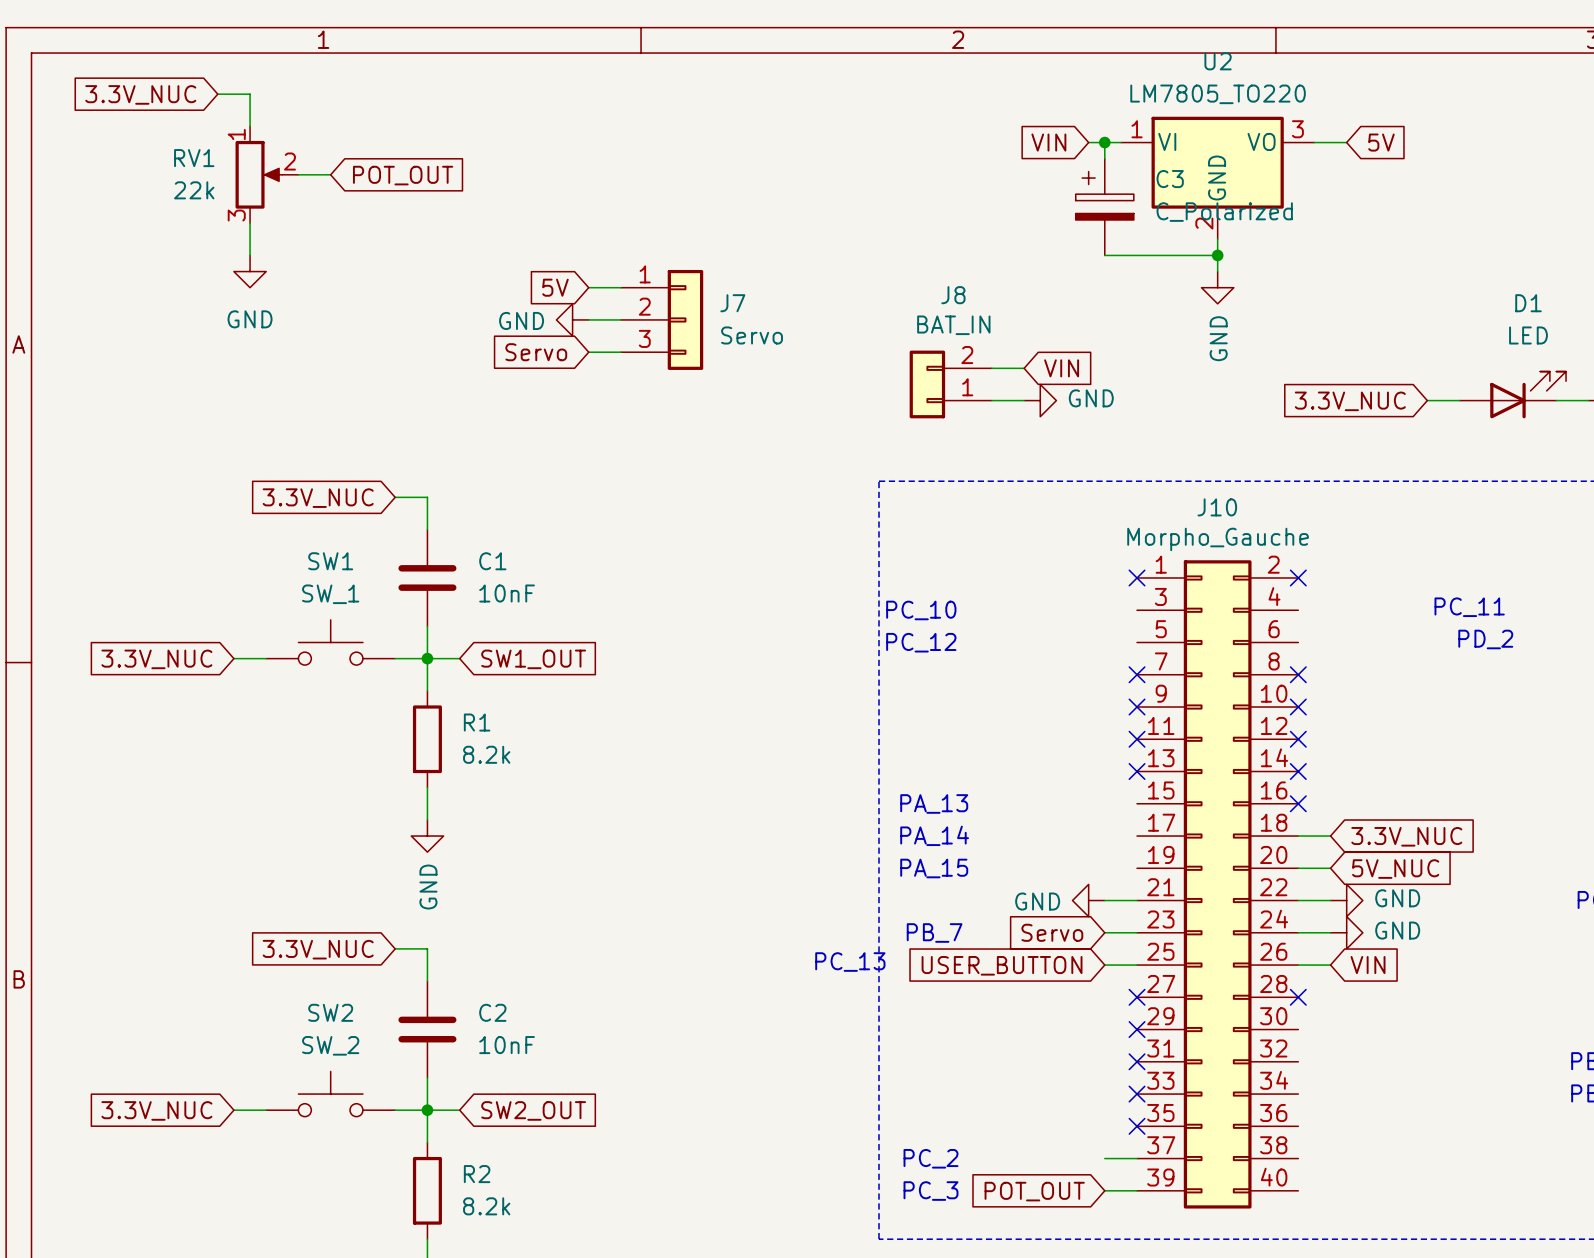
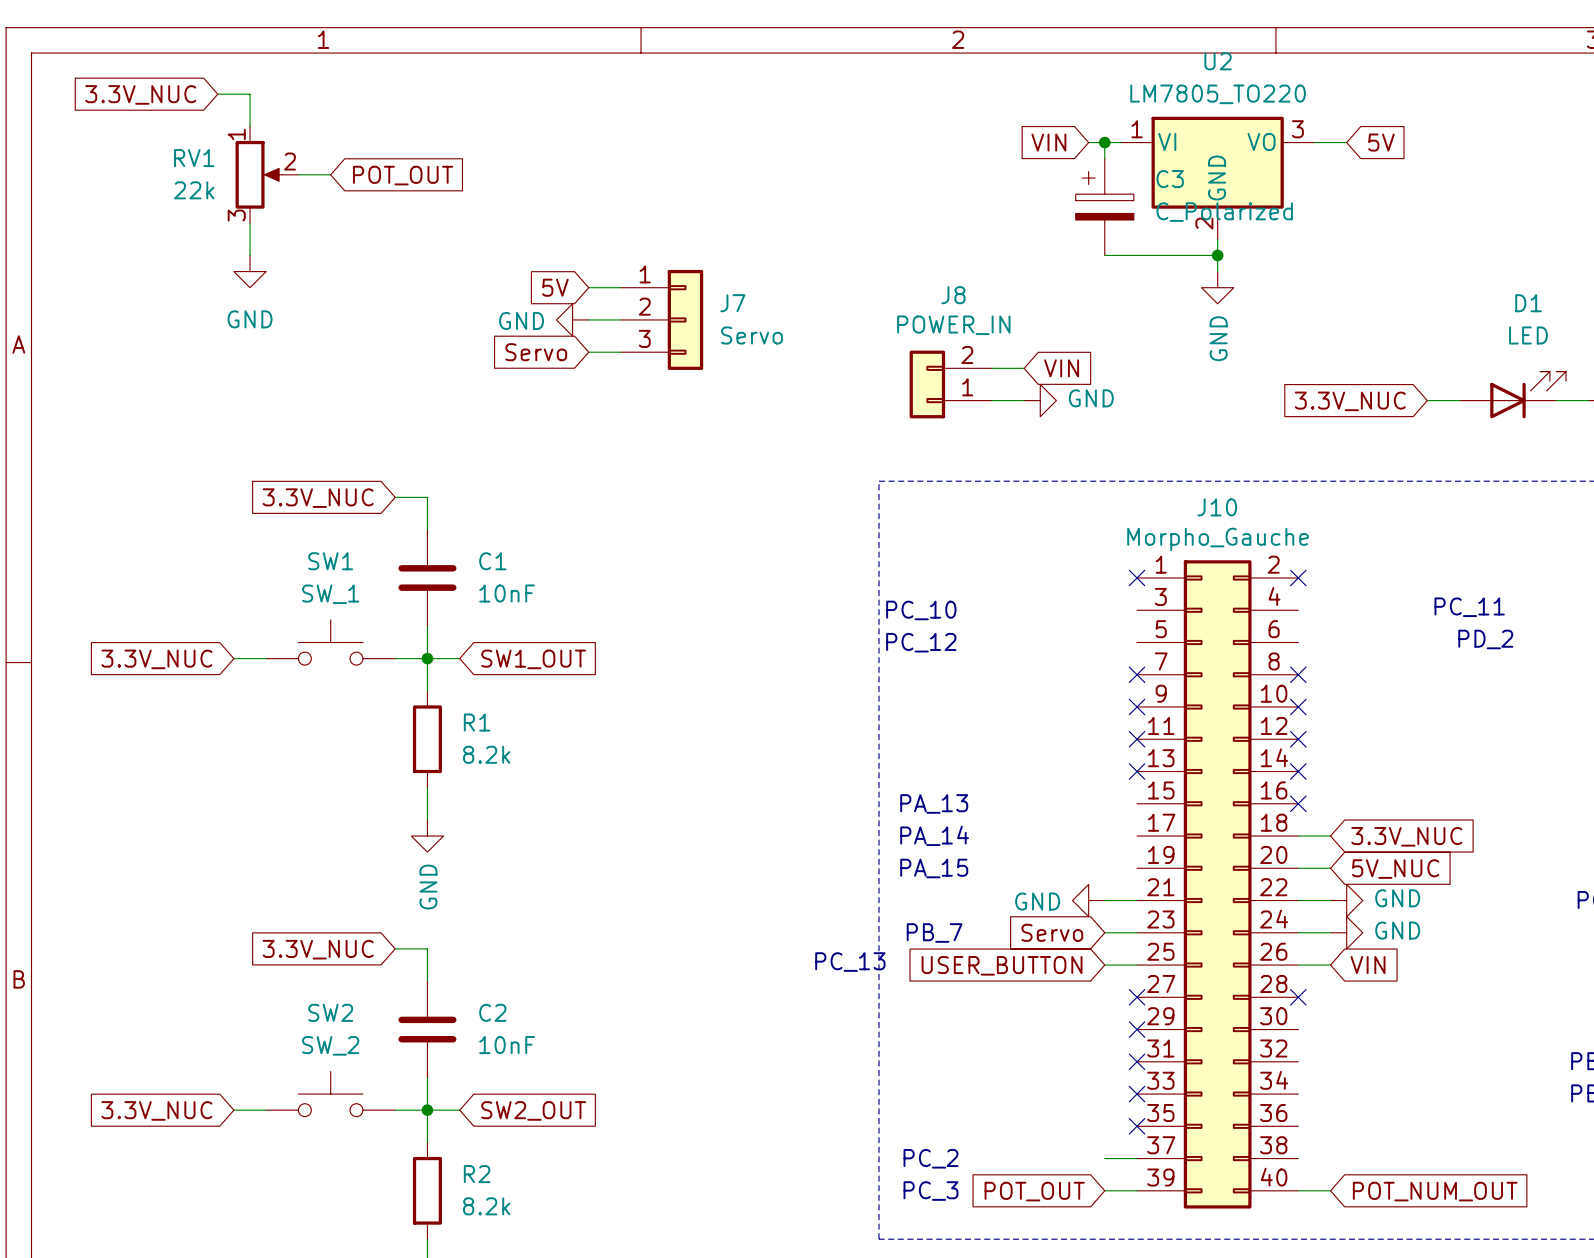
J8 value: BAT_IN (953, 325) -> POWER_IN (953, 325)
wire: none -> (1298, 1190) (1330, 1190)
global label: none -> POT_NUM_OUT (1435, 1191)

